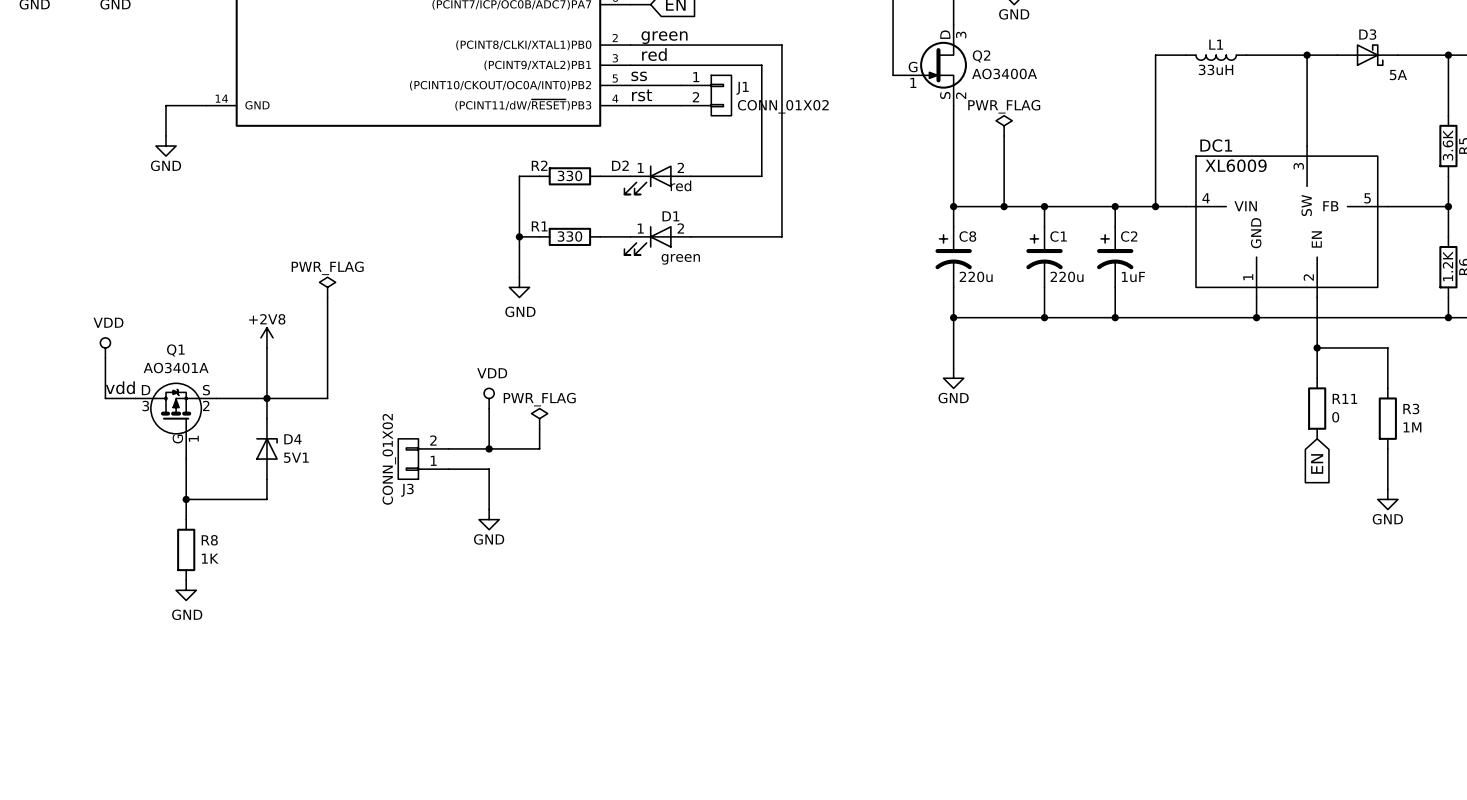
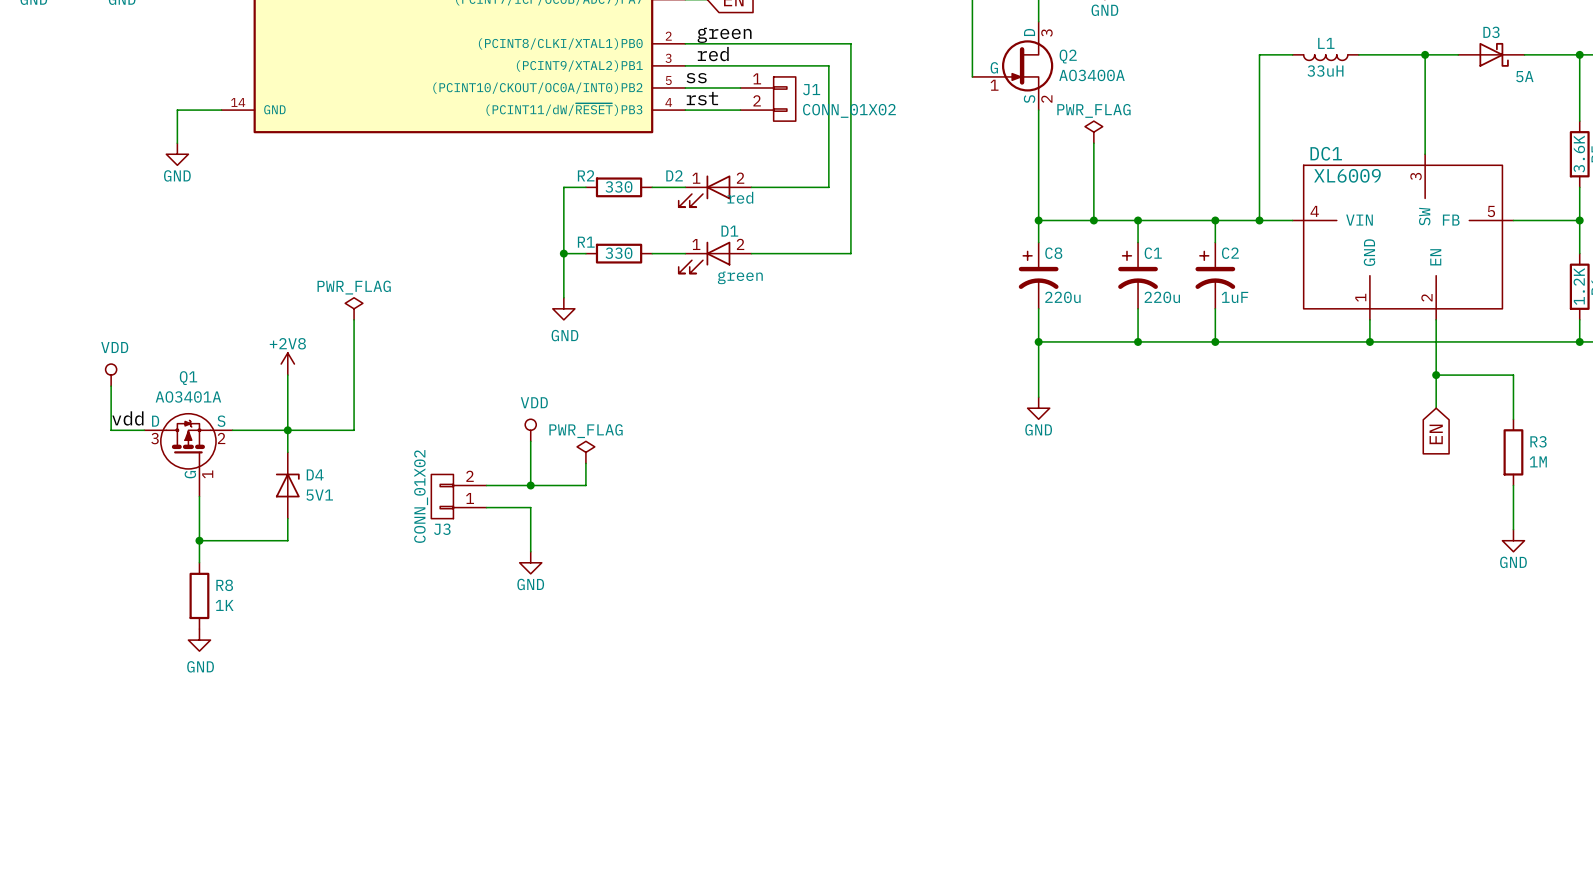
R11: 0 (1317, 408) -> none
global label position: EN (1317, 463) -> EN (1436, 434)

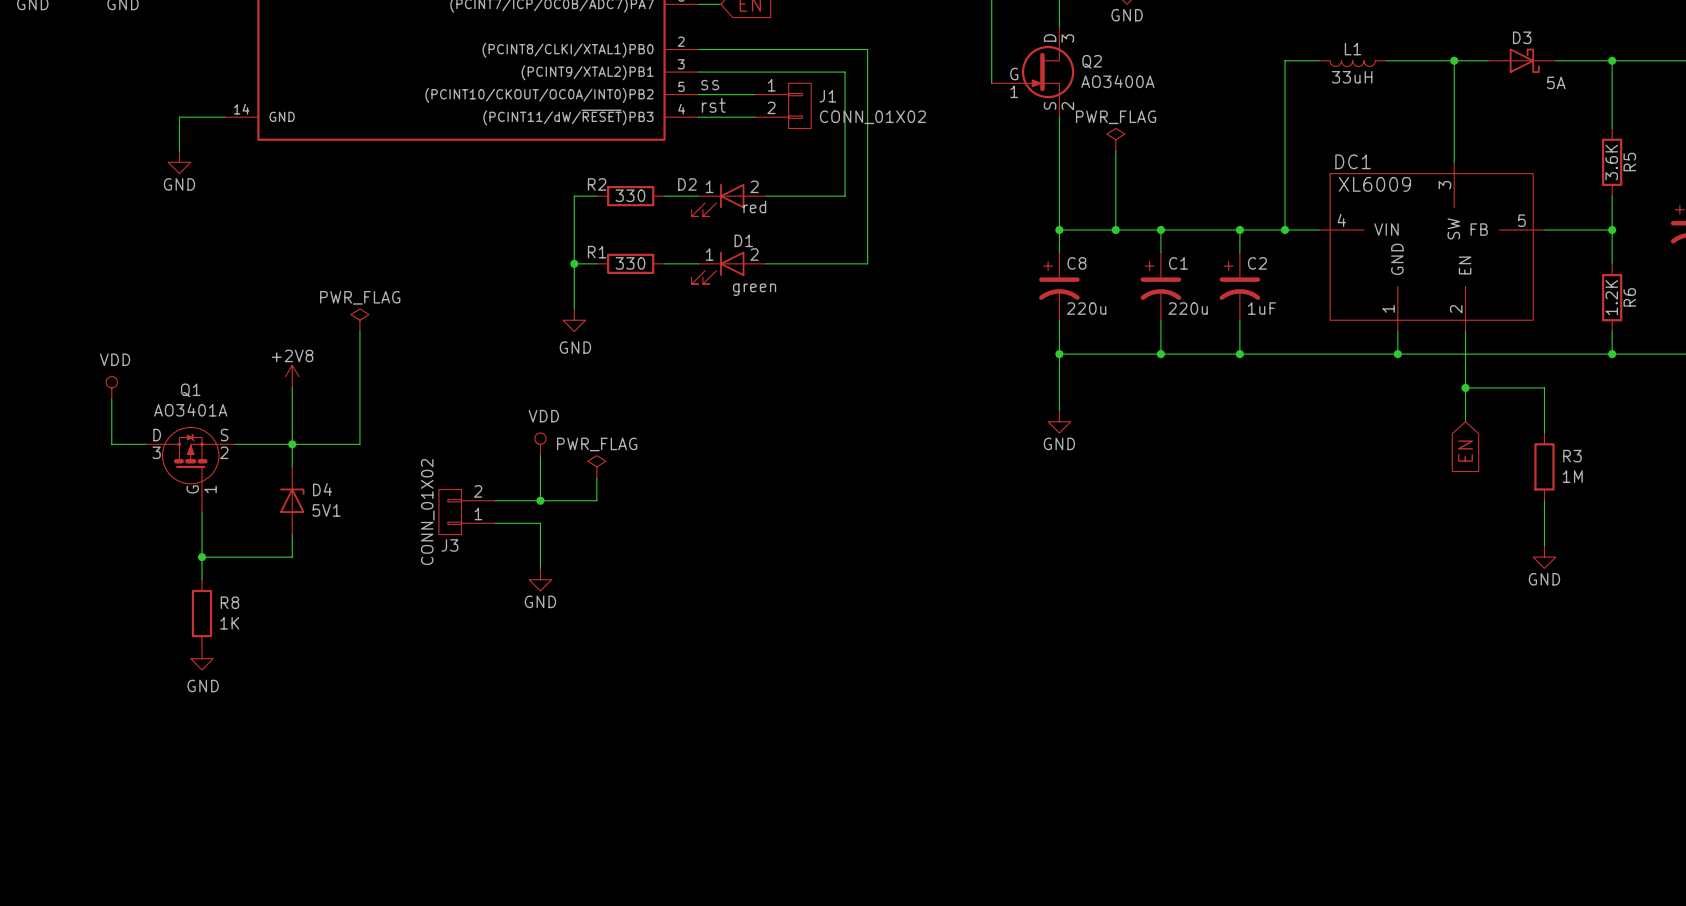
label: green (724, 35) -> none
label: red (713, 54) -> none
label: vdd (127, 418) -> none

